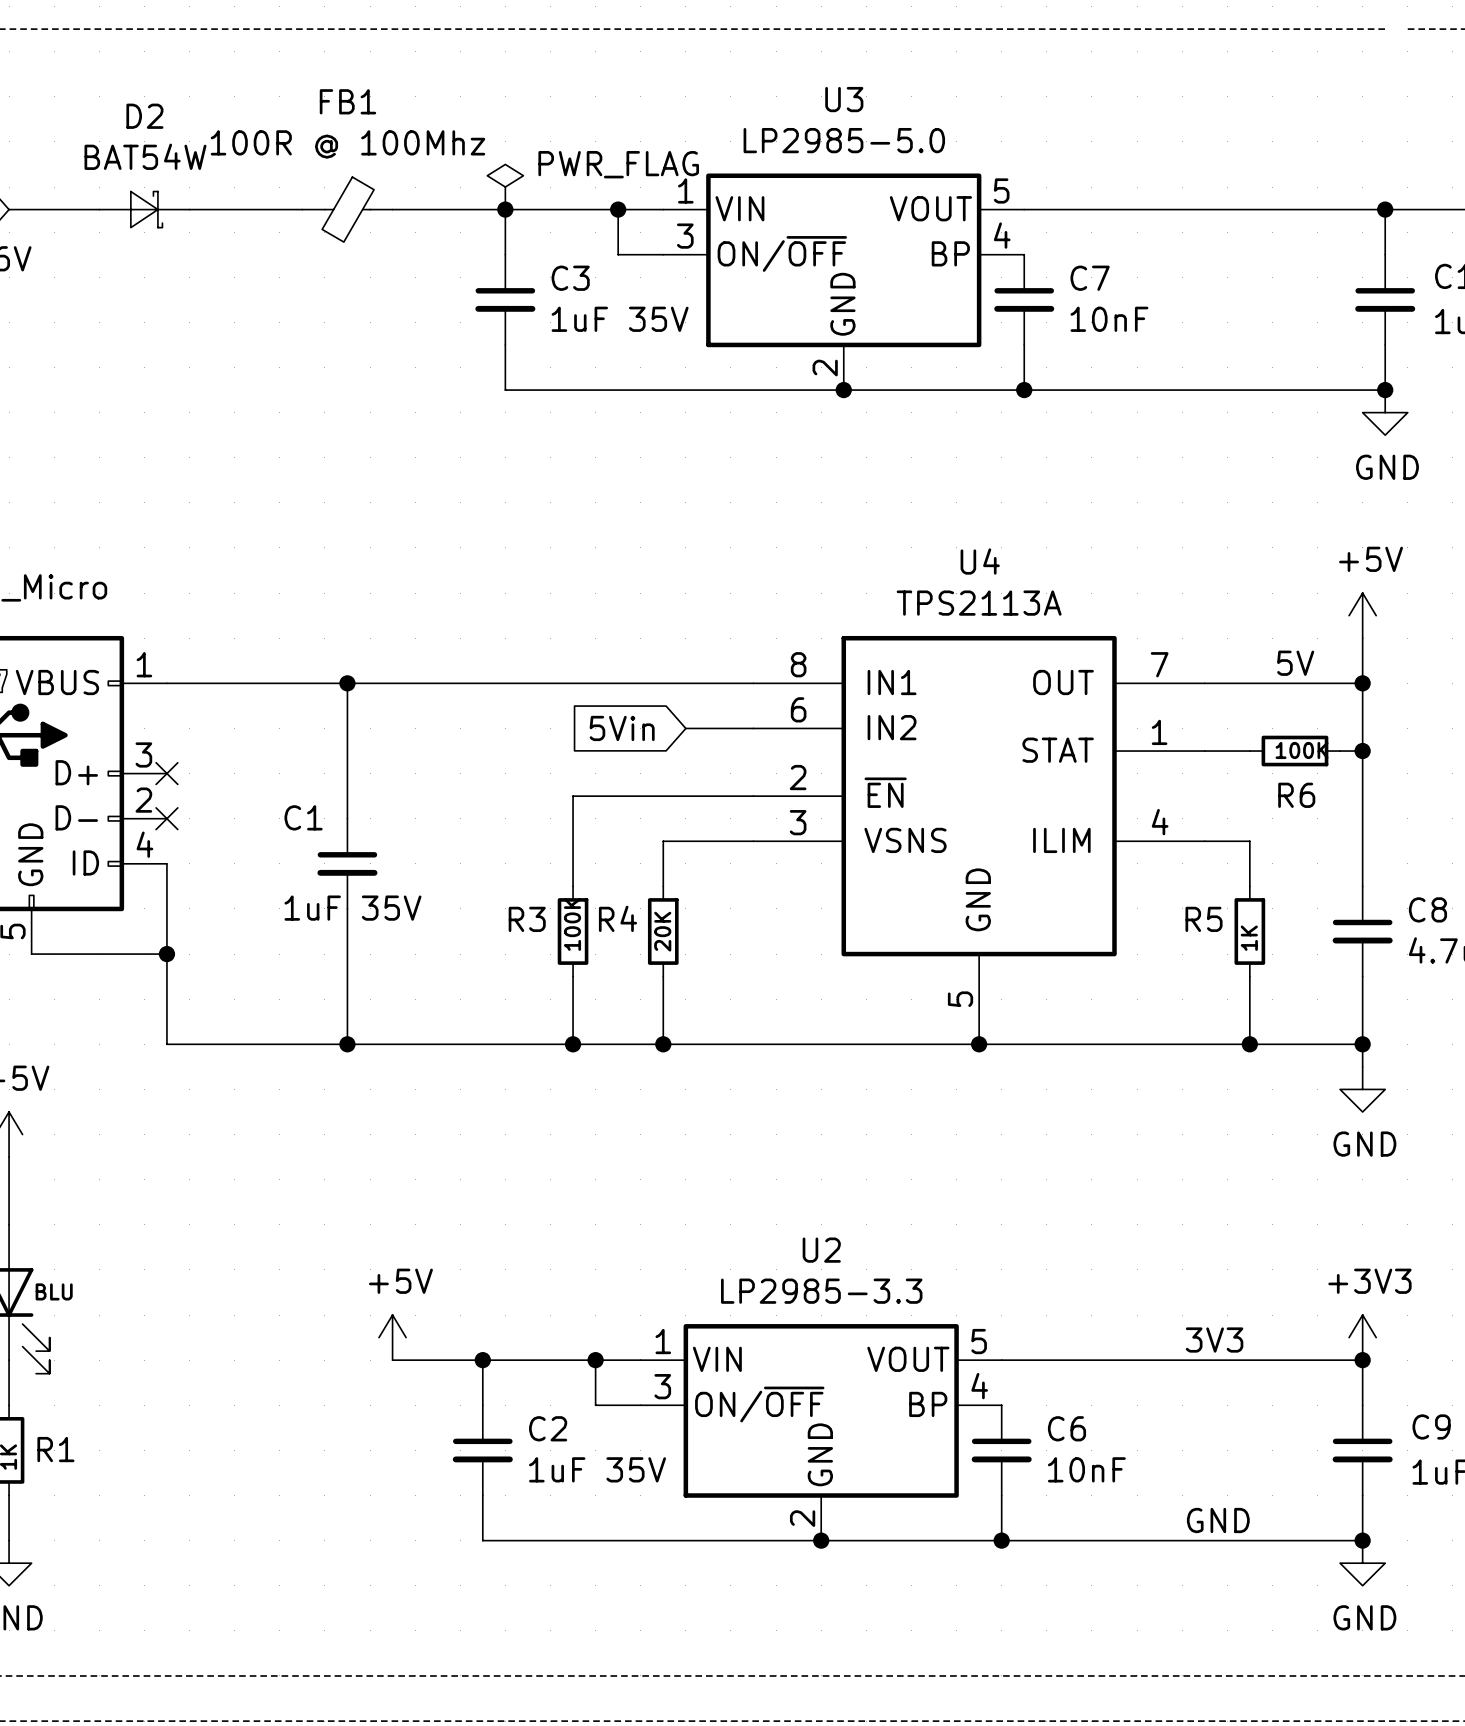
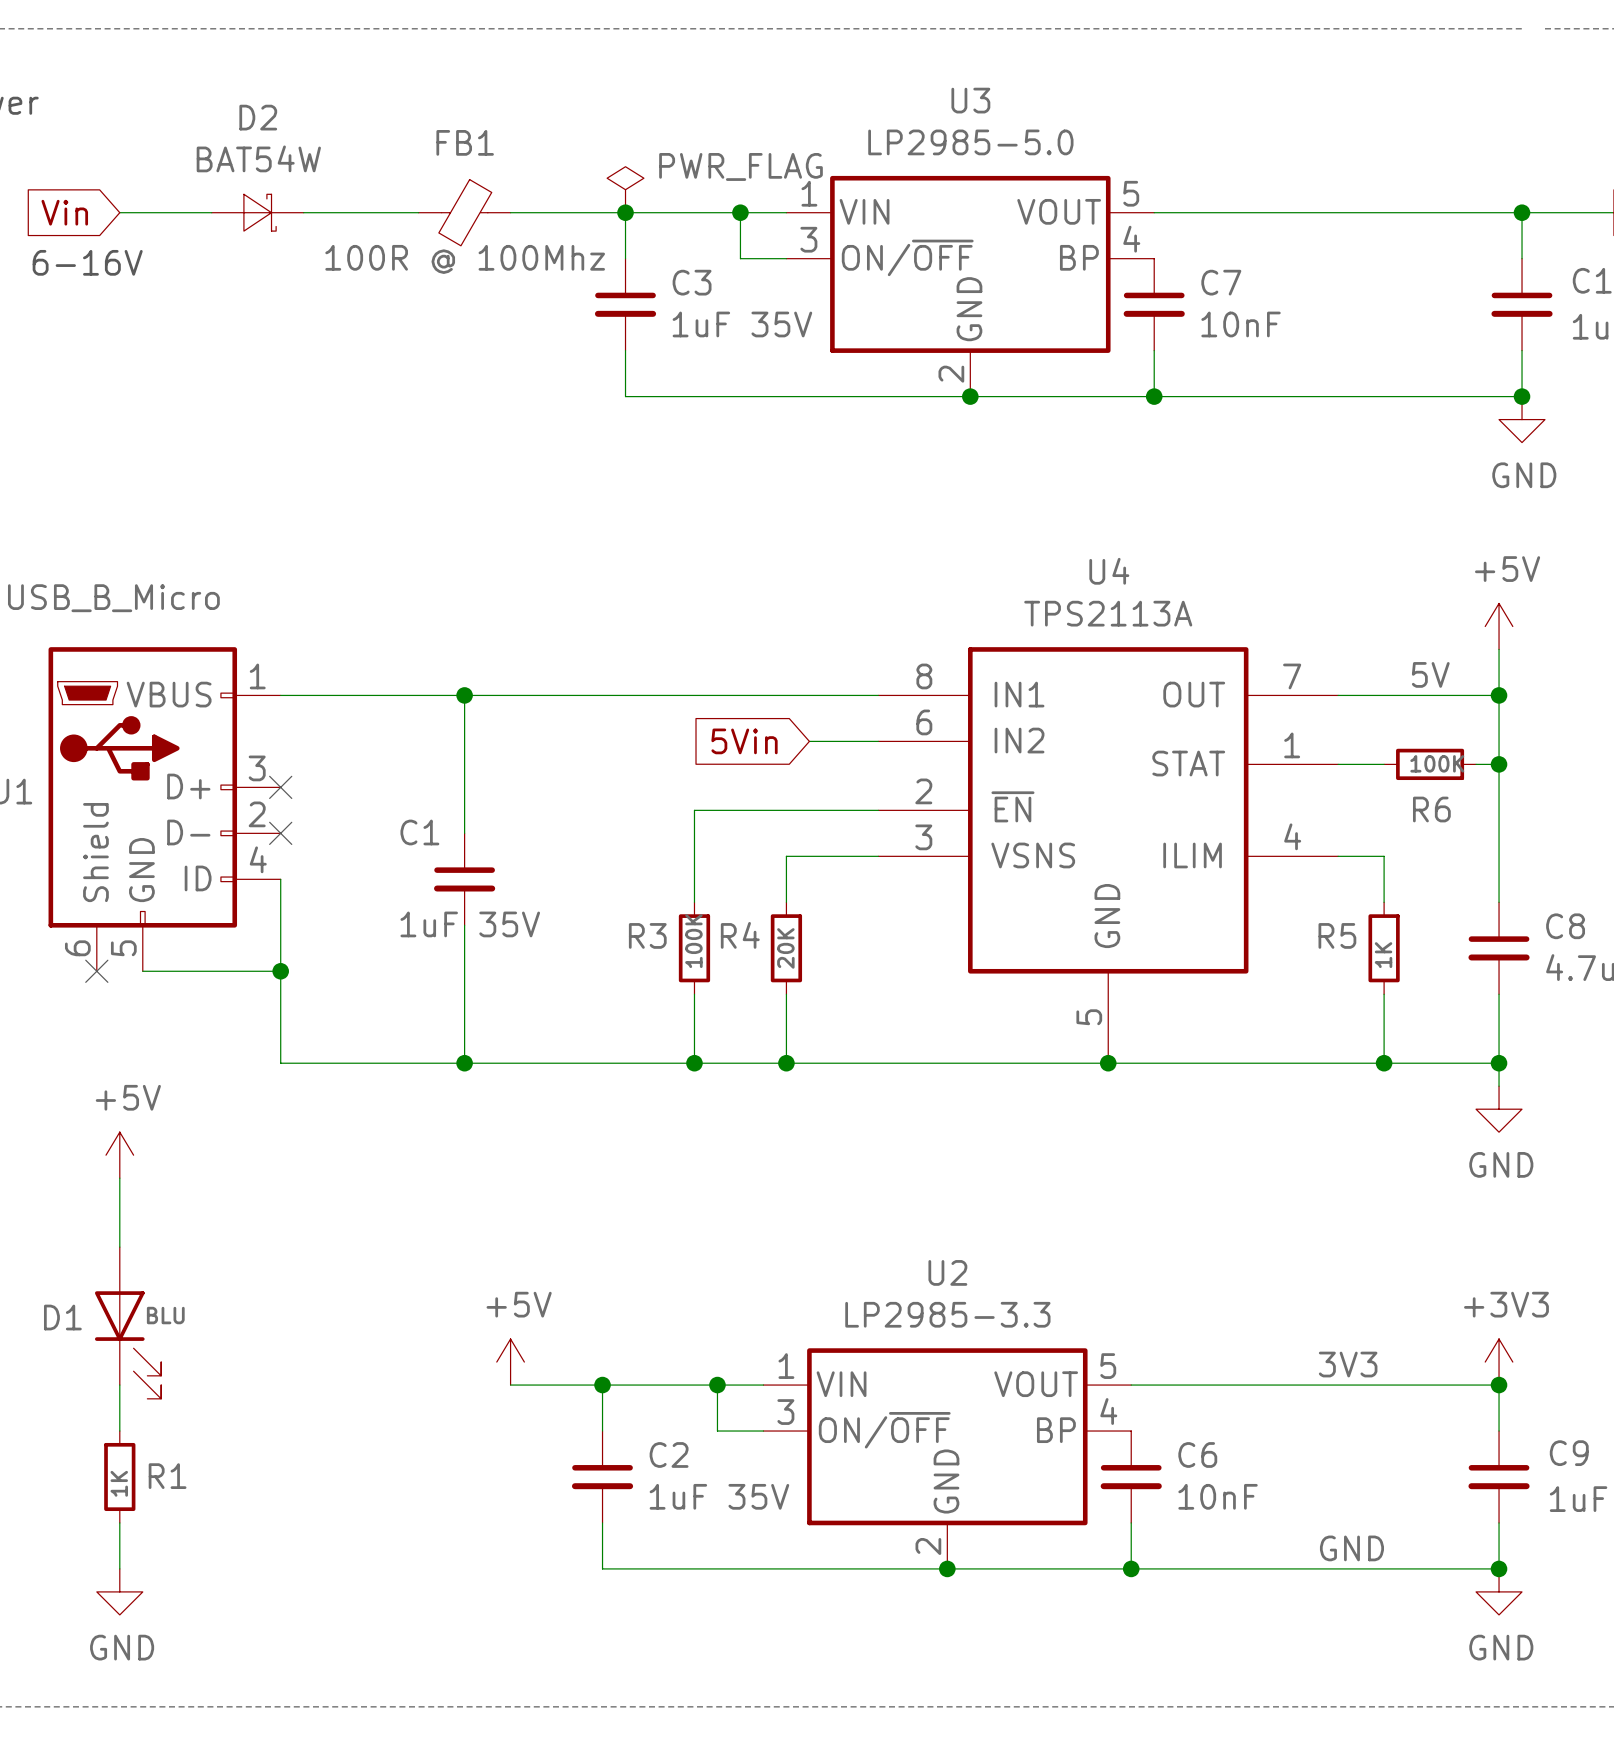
FB1 name position: FB1 (347, 101) -> FB1 (465, 142)
FB1 value position: 100R @ 100Mhz (347, 144) -> 100R @ 100Mhz (465, 259)

